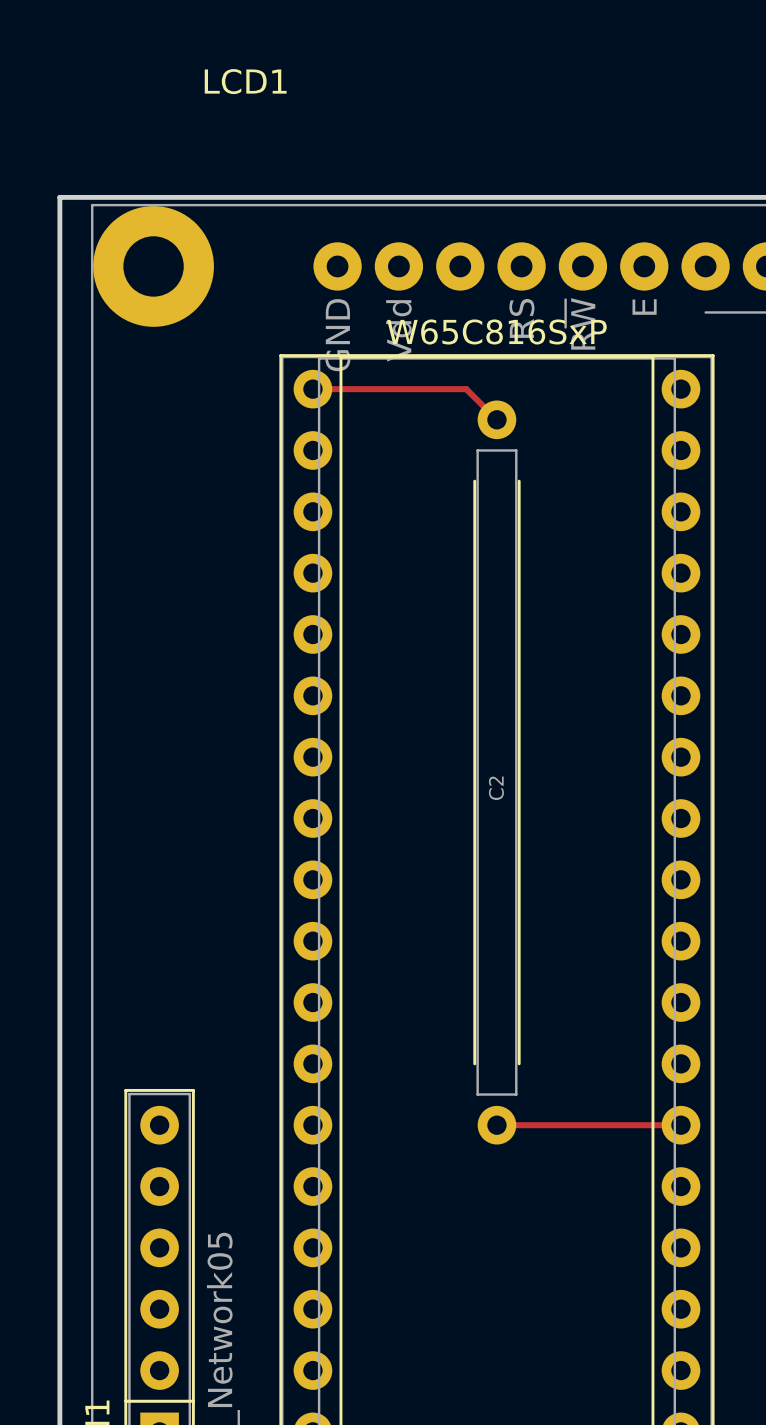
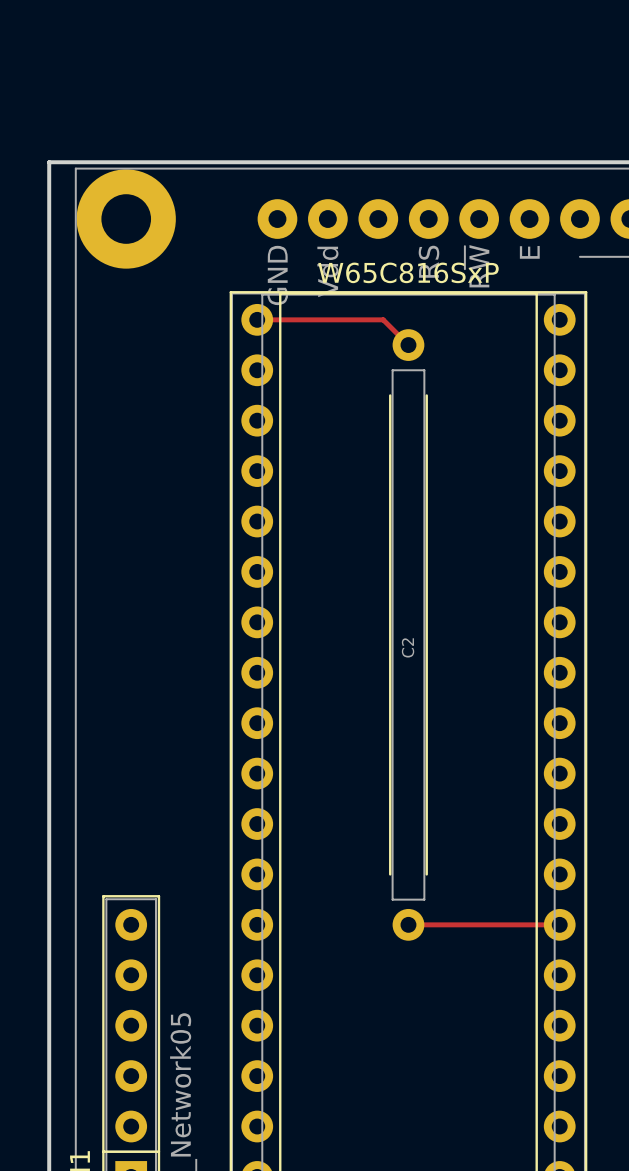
LCD1 name: LCD1 (245, 81) -> none

